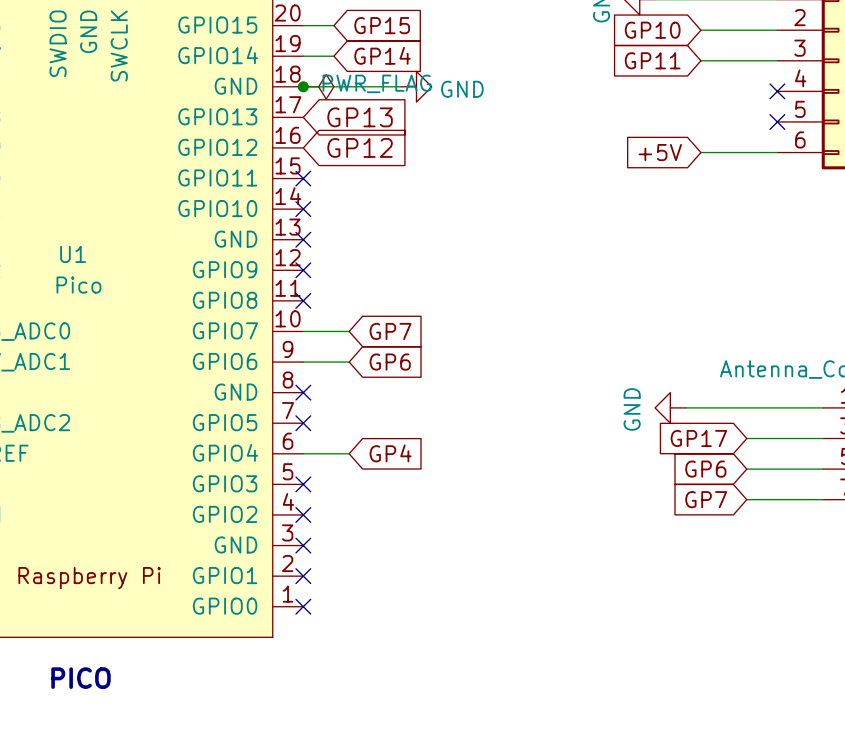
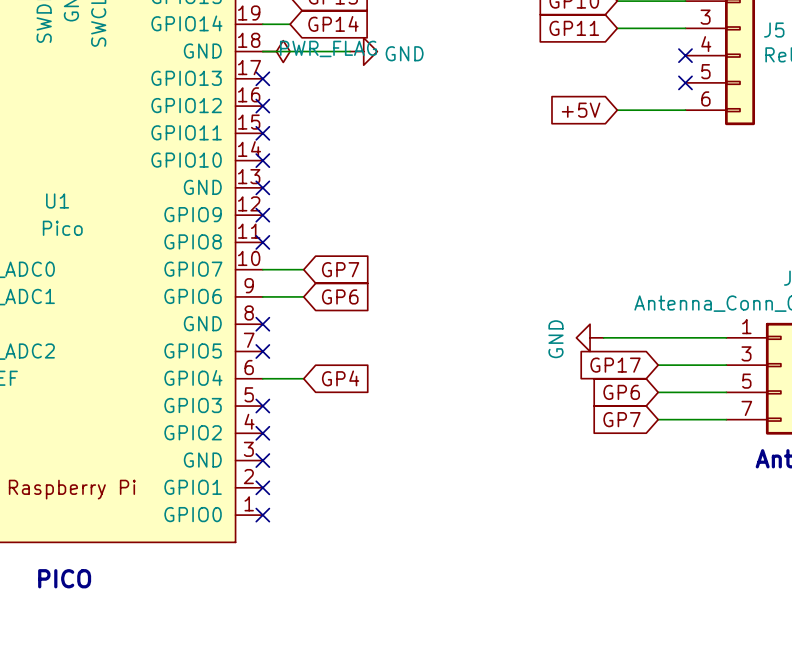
junction: (303, 86) -> none
no-connect mark: none -> (262, 78)
global label: GP13 (360, 117) -> none
no-connect mark: none -> (262, 106)
global label: GP12 (360, 147) -> none

